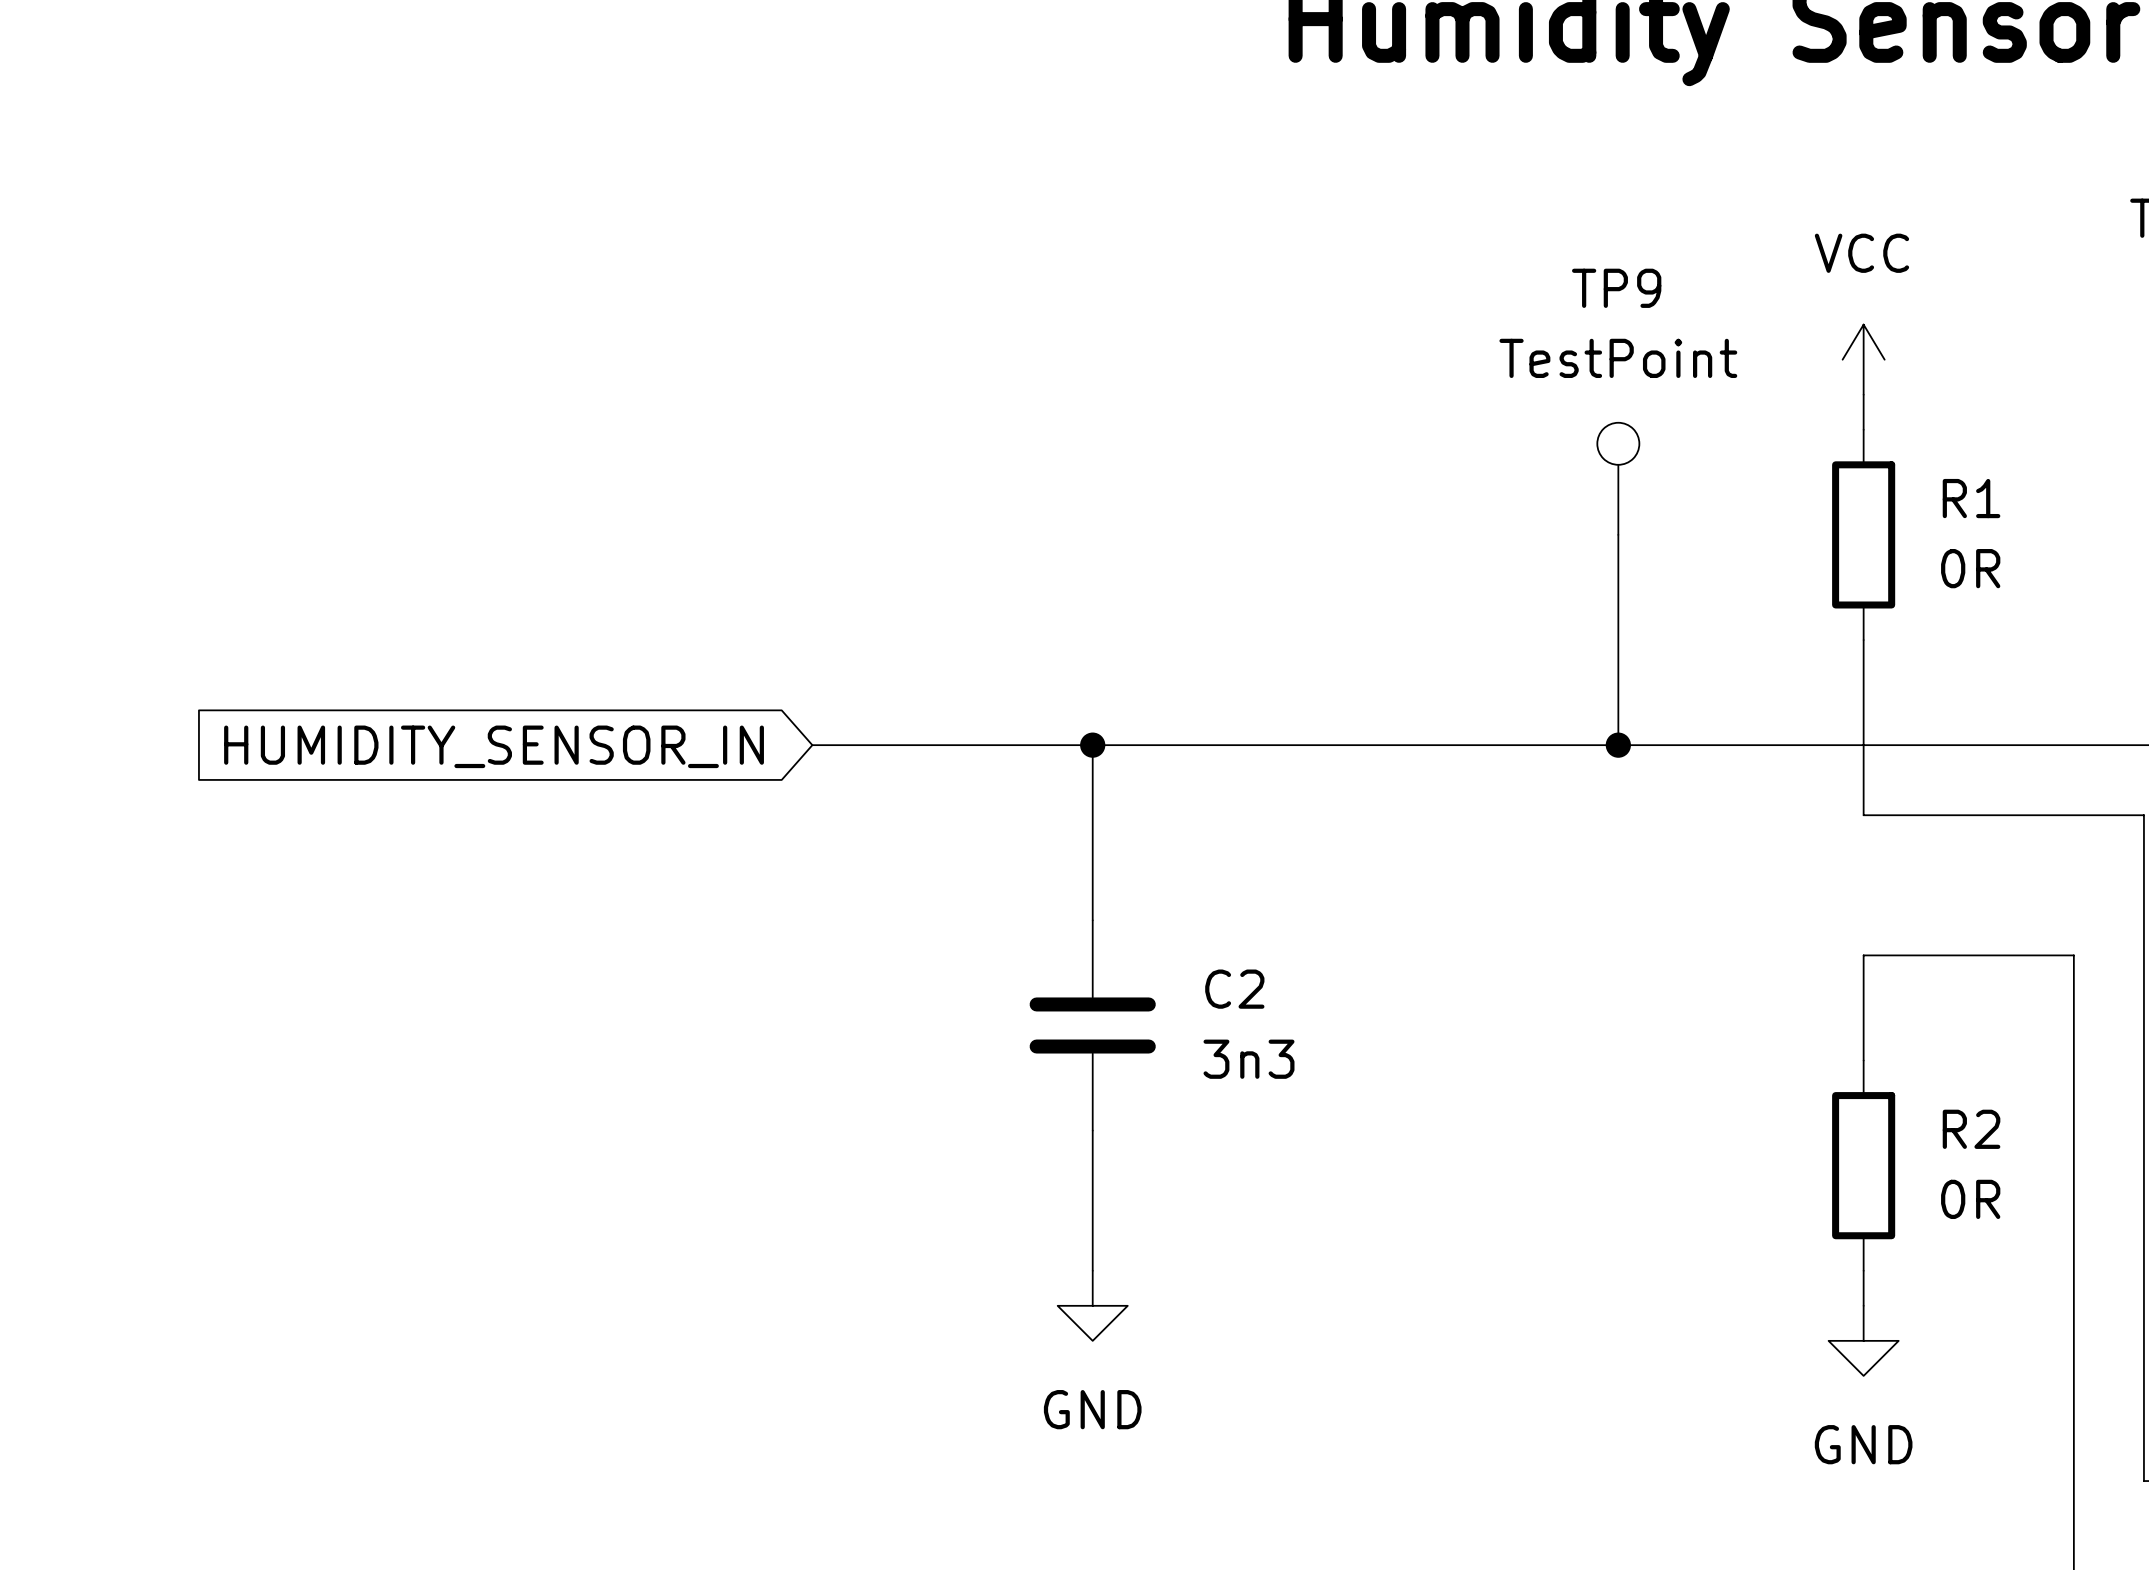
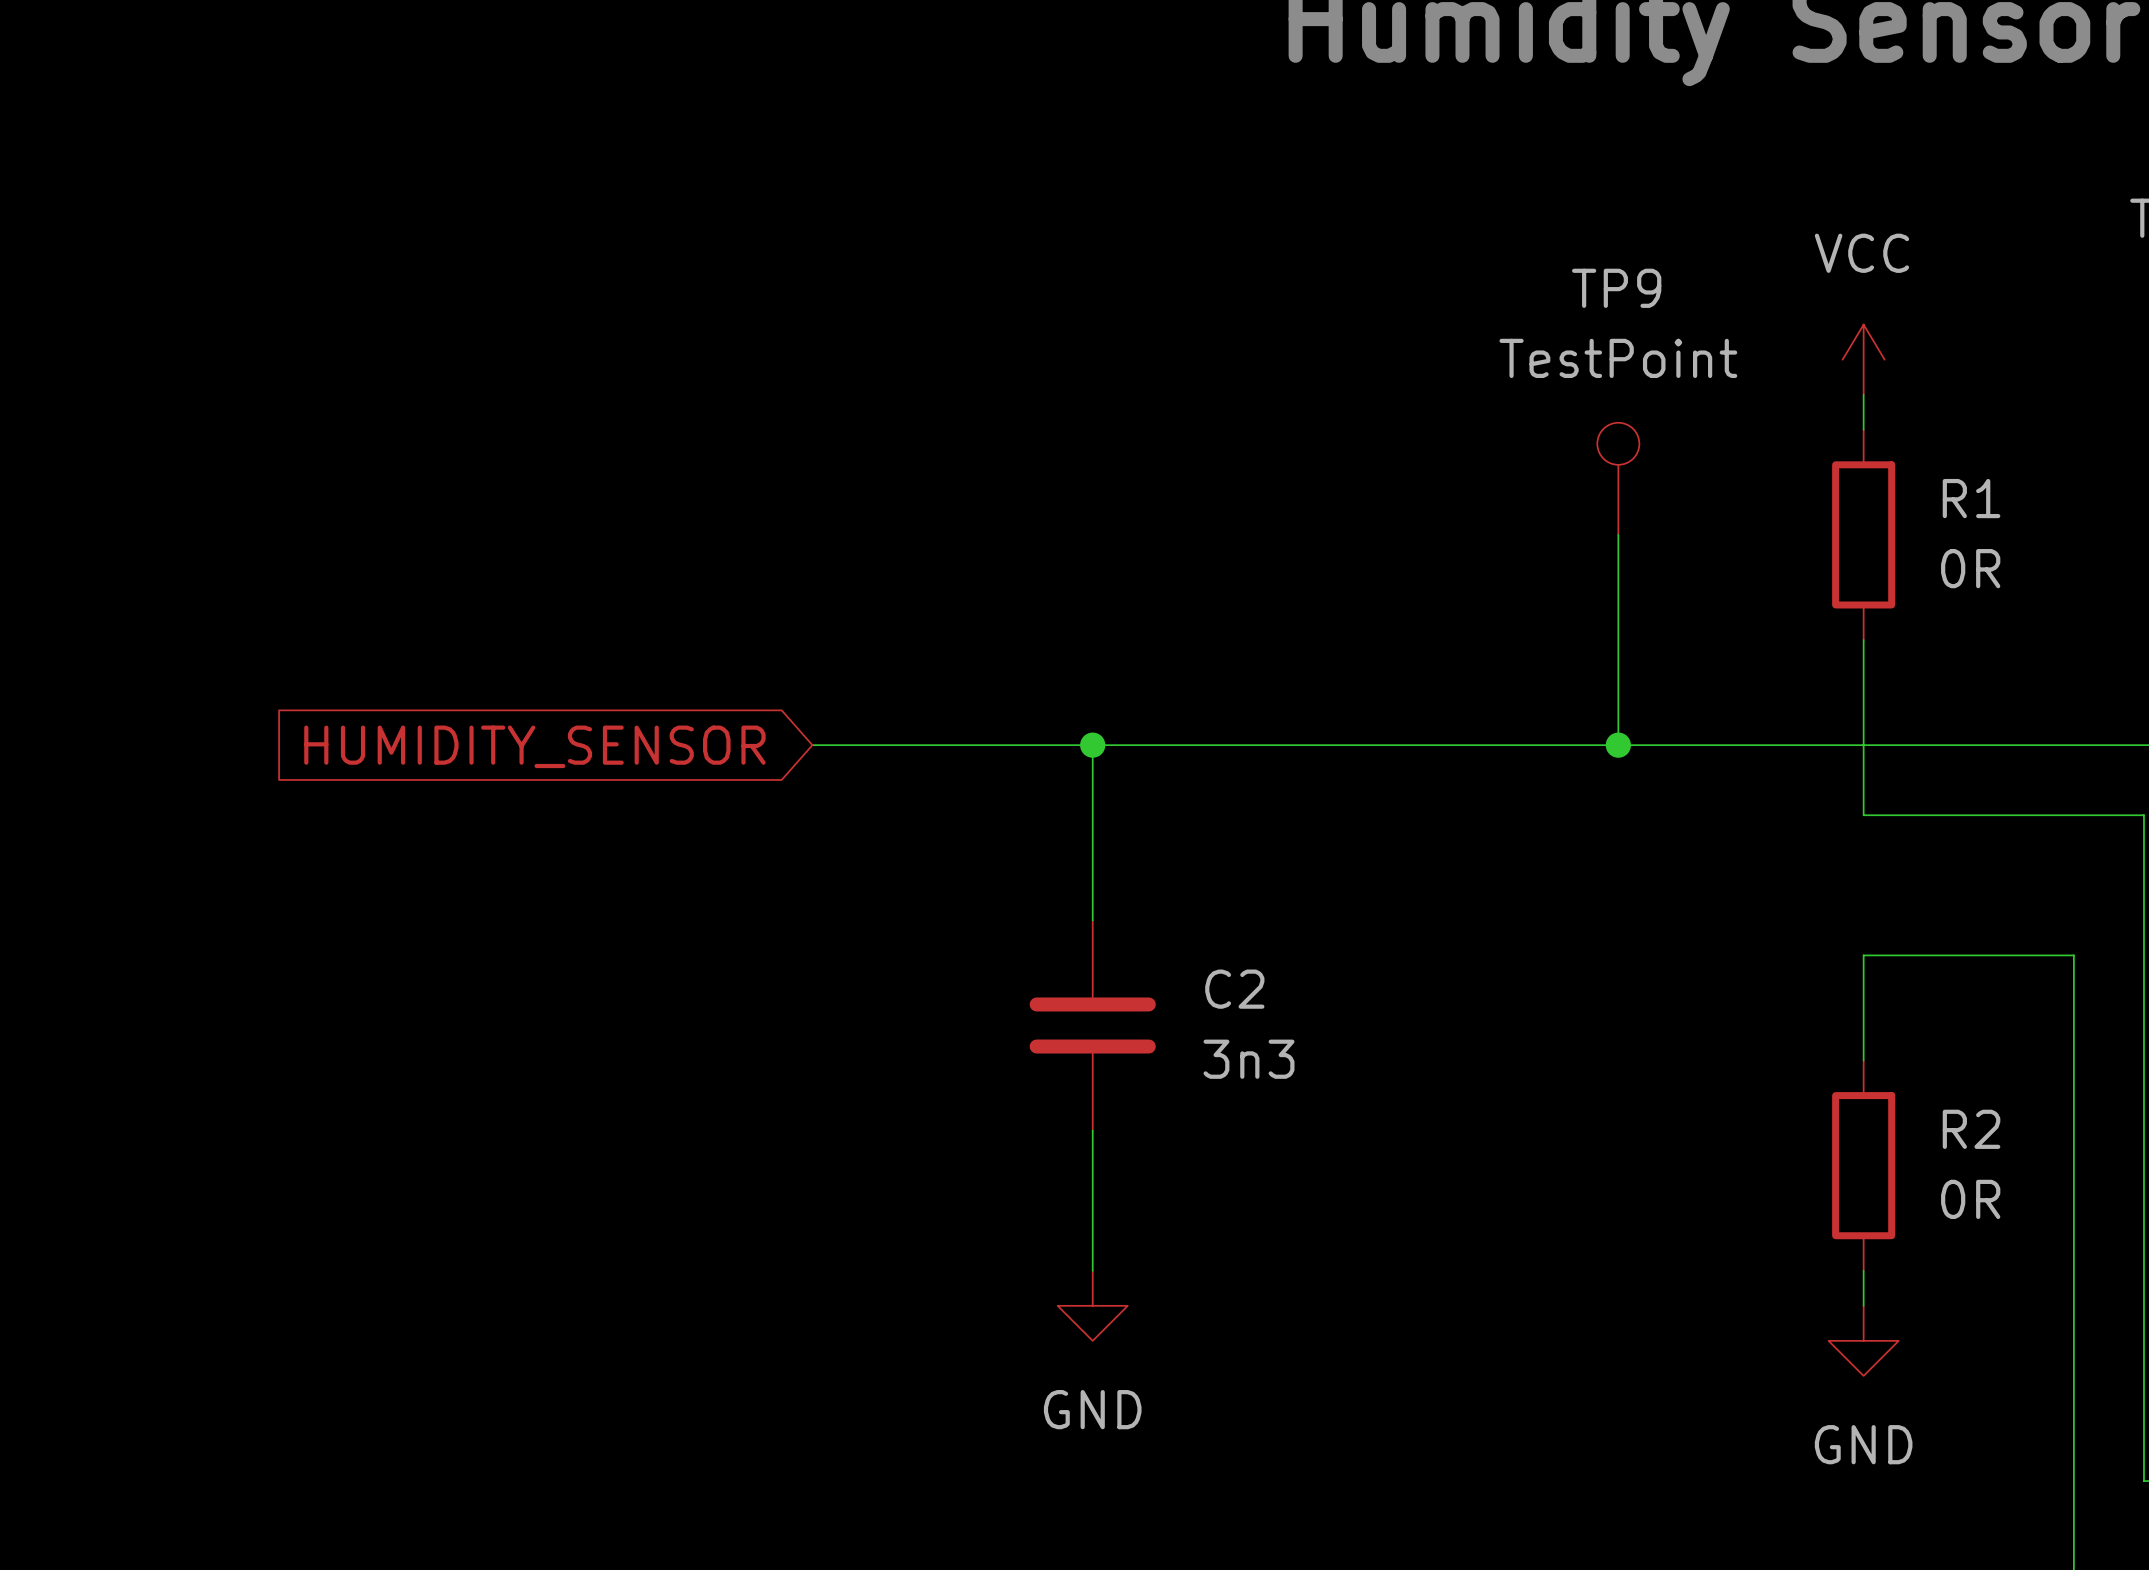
global label: HUMIDITY_SENSOR_IN (494, 746) -> HUMIDITY_SENSOR (534, 746)

